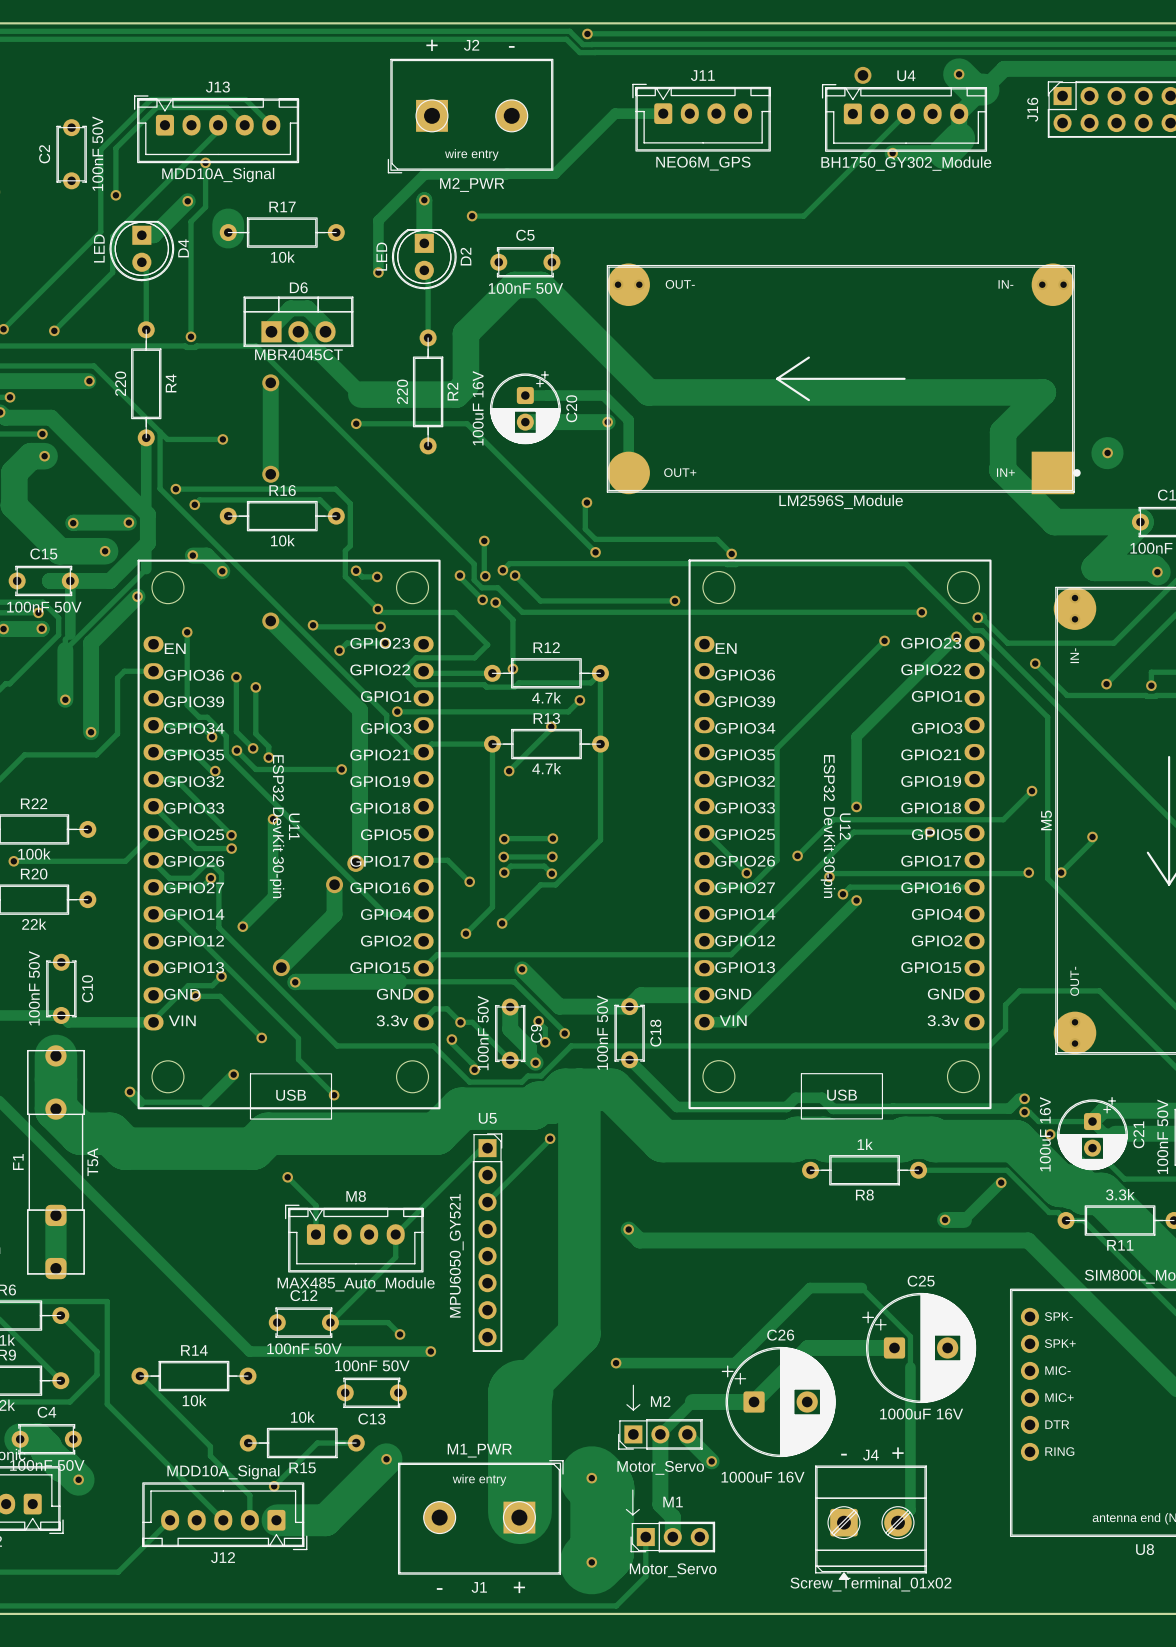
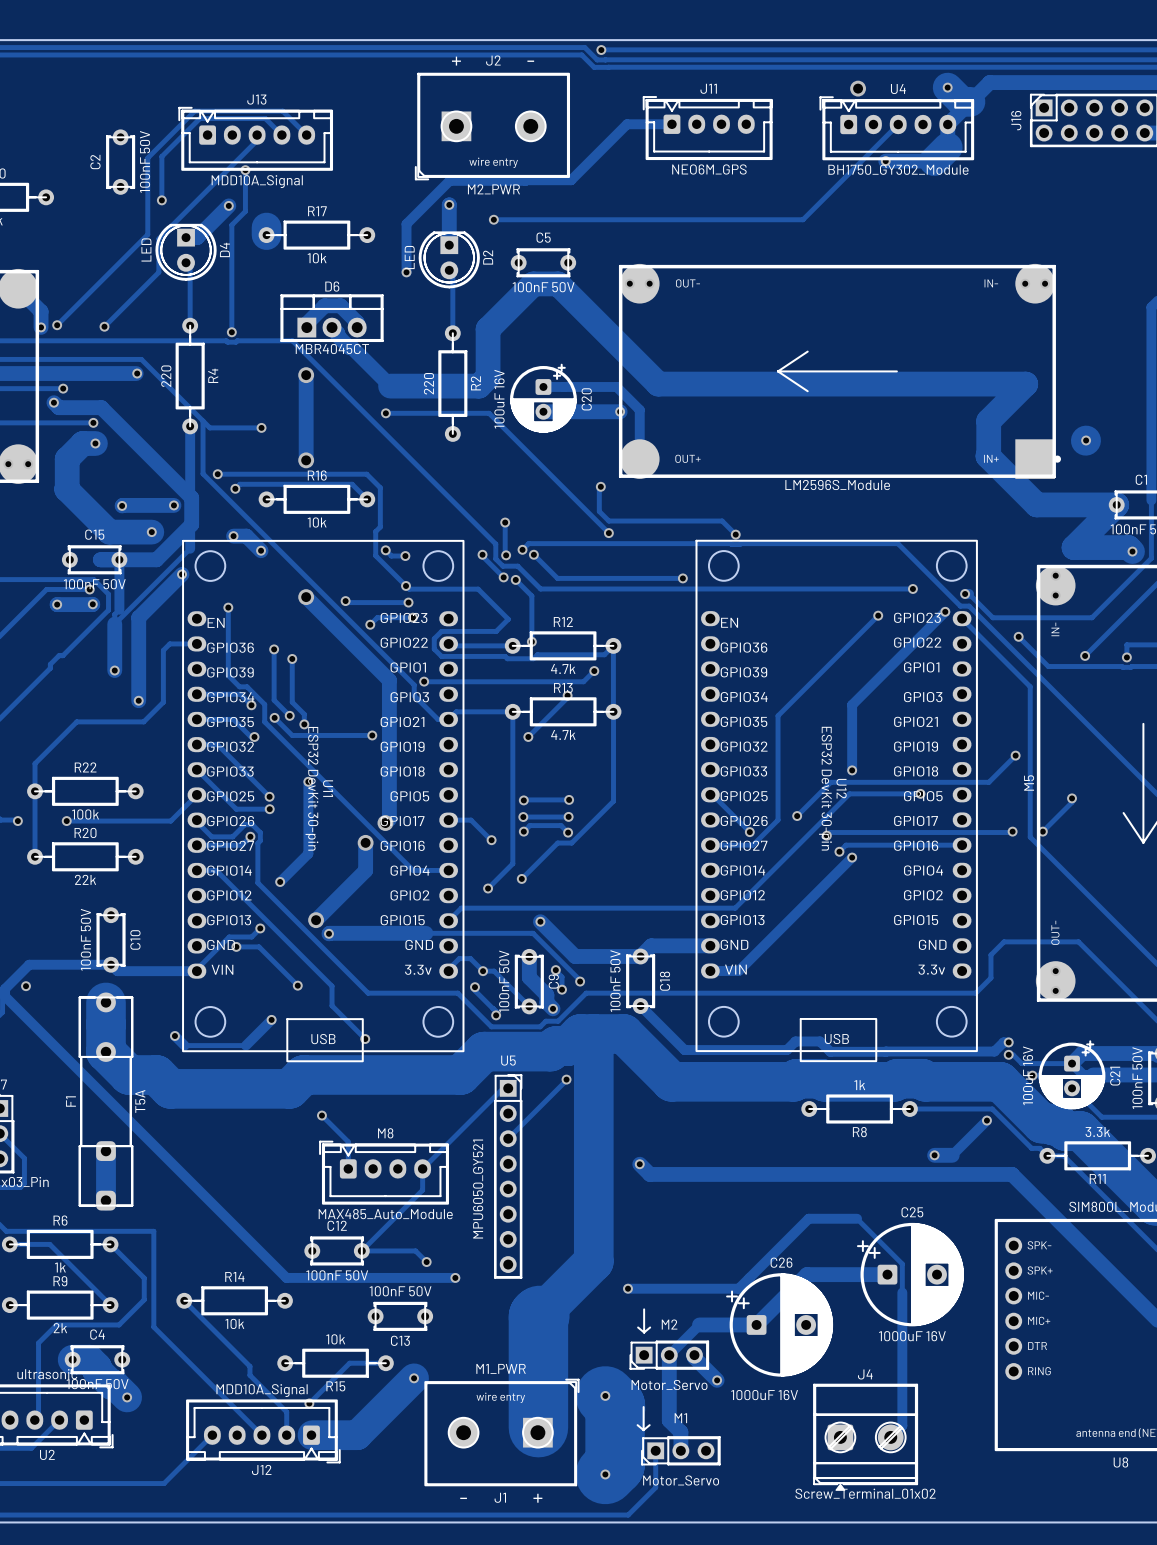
text: + (898, 1453) -> none
text: - (843, 1454) -> none

